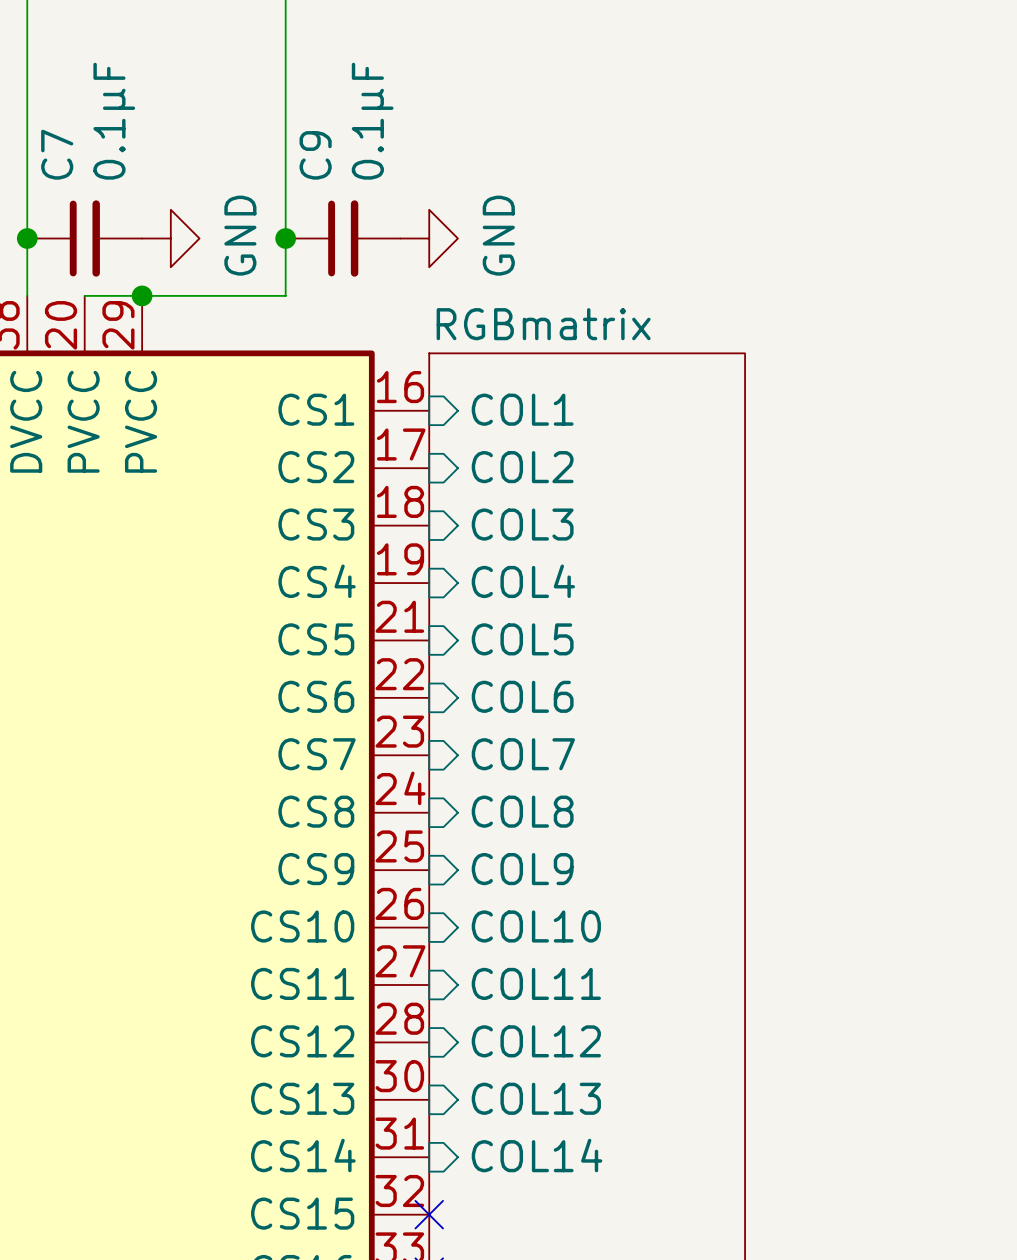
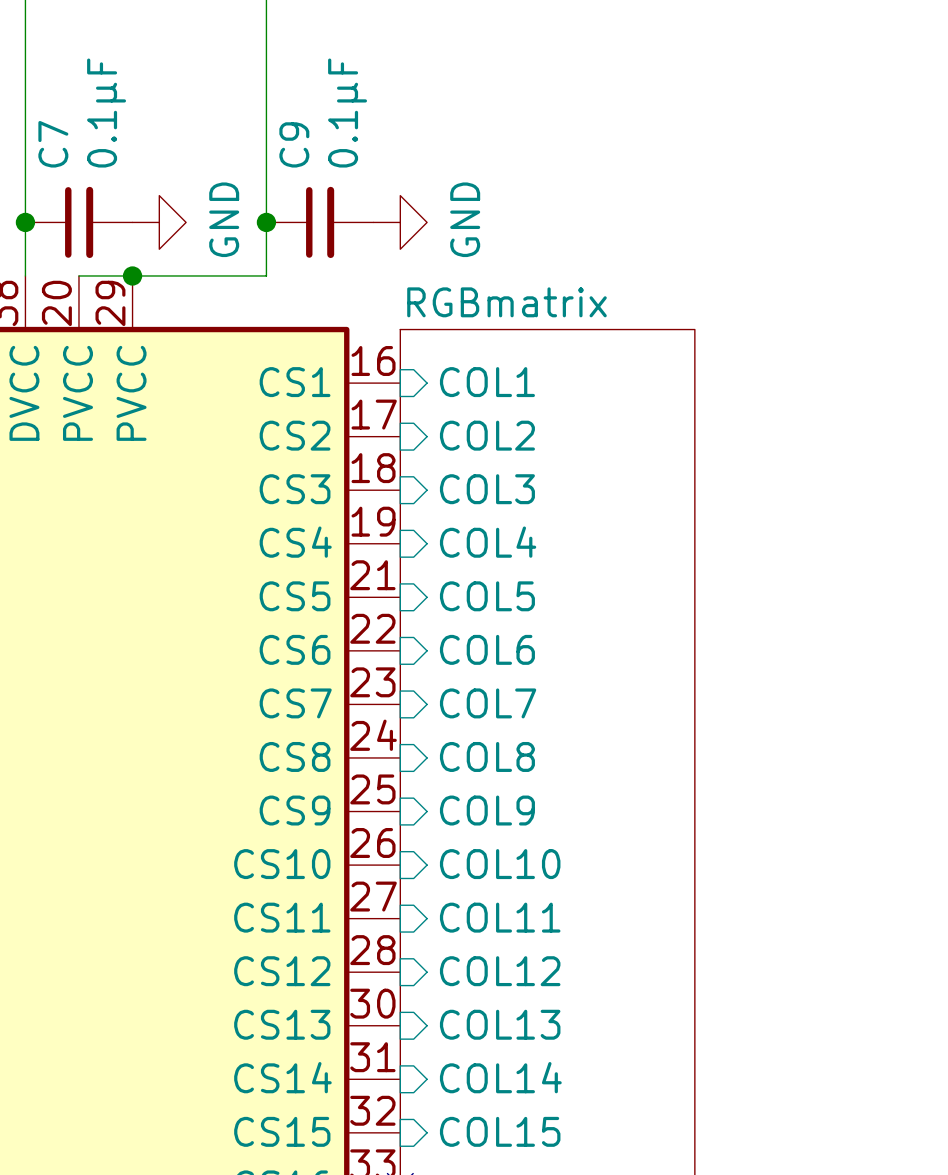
sheet pin: none -> COL15 (500, 1131)
no-connect mark: (429, 1214) -> none

